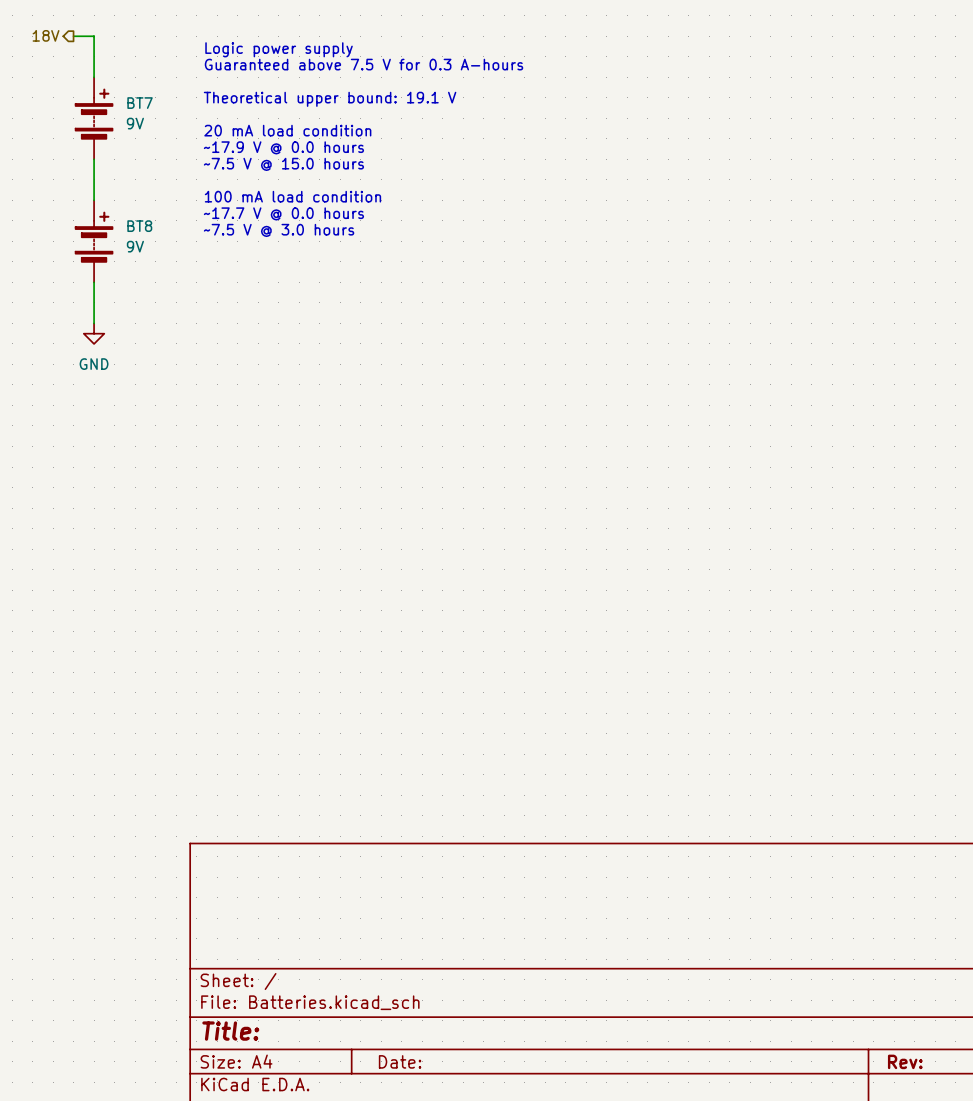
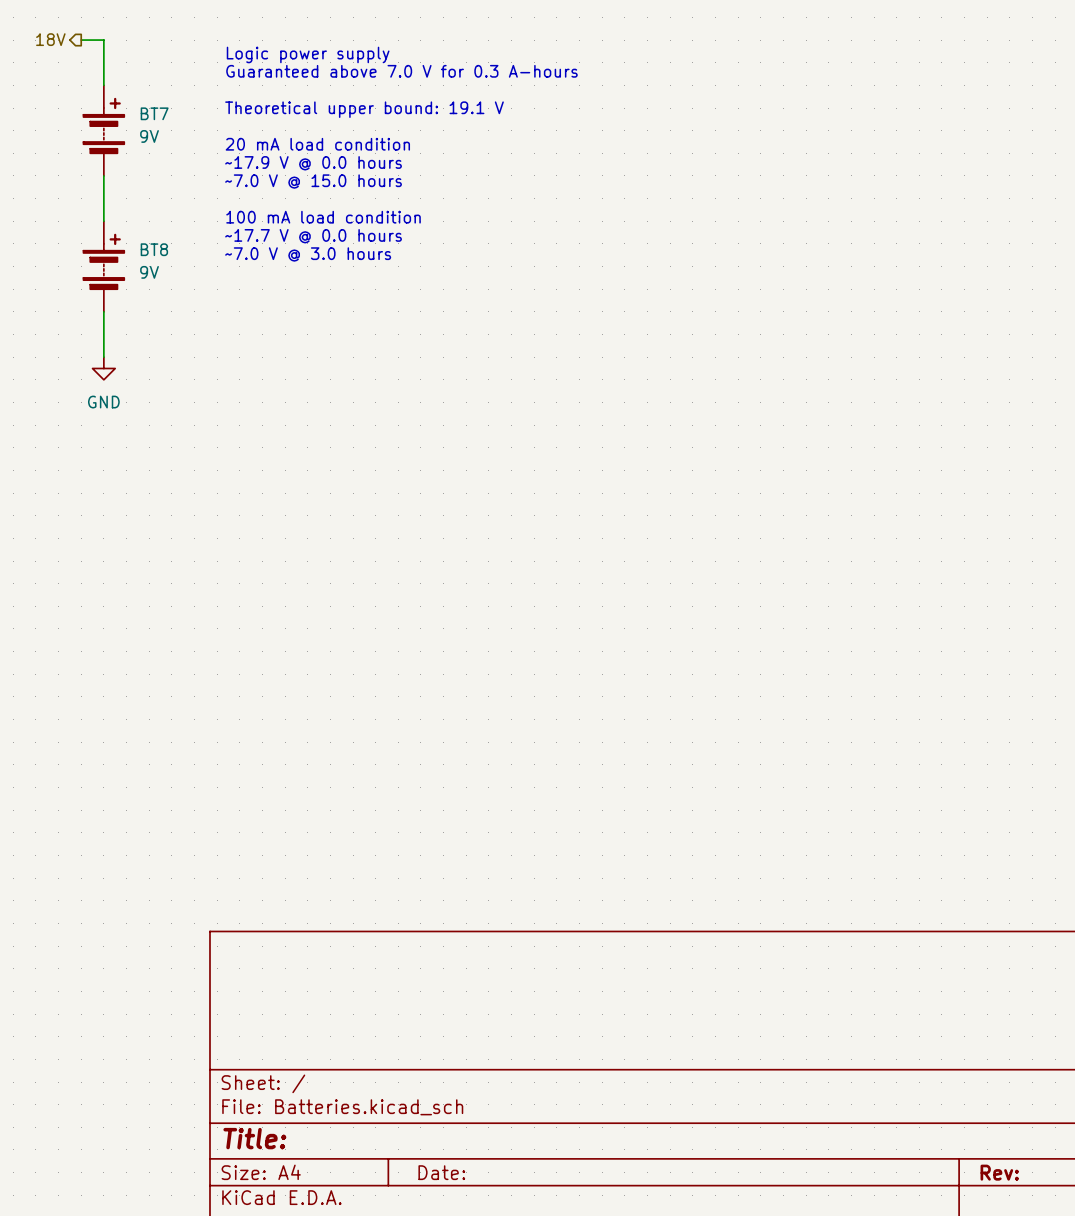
text: Guaranteed above 7.5 V for 0.3 A-hours (364, 64) -> Guaranteed above 7.0 V for 0.3 A-hours (401, 71)
text: ~7.5 V @ 15.0 hours (283, 164) -> ~7.0 V @ 15.0 hours (313, 181)
text: ~7.5 V @ 3.0 hours (279, 230) -> ~7.0 V @ 3.0 hours (308, 254)

